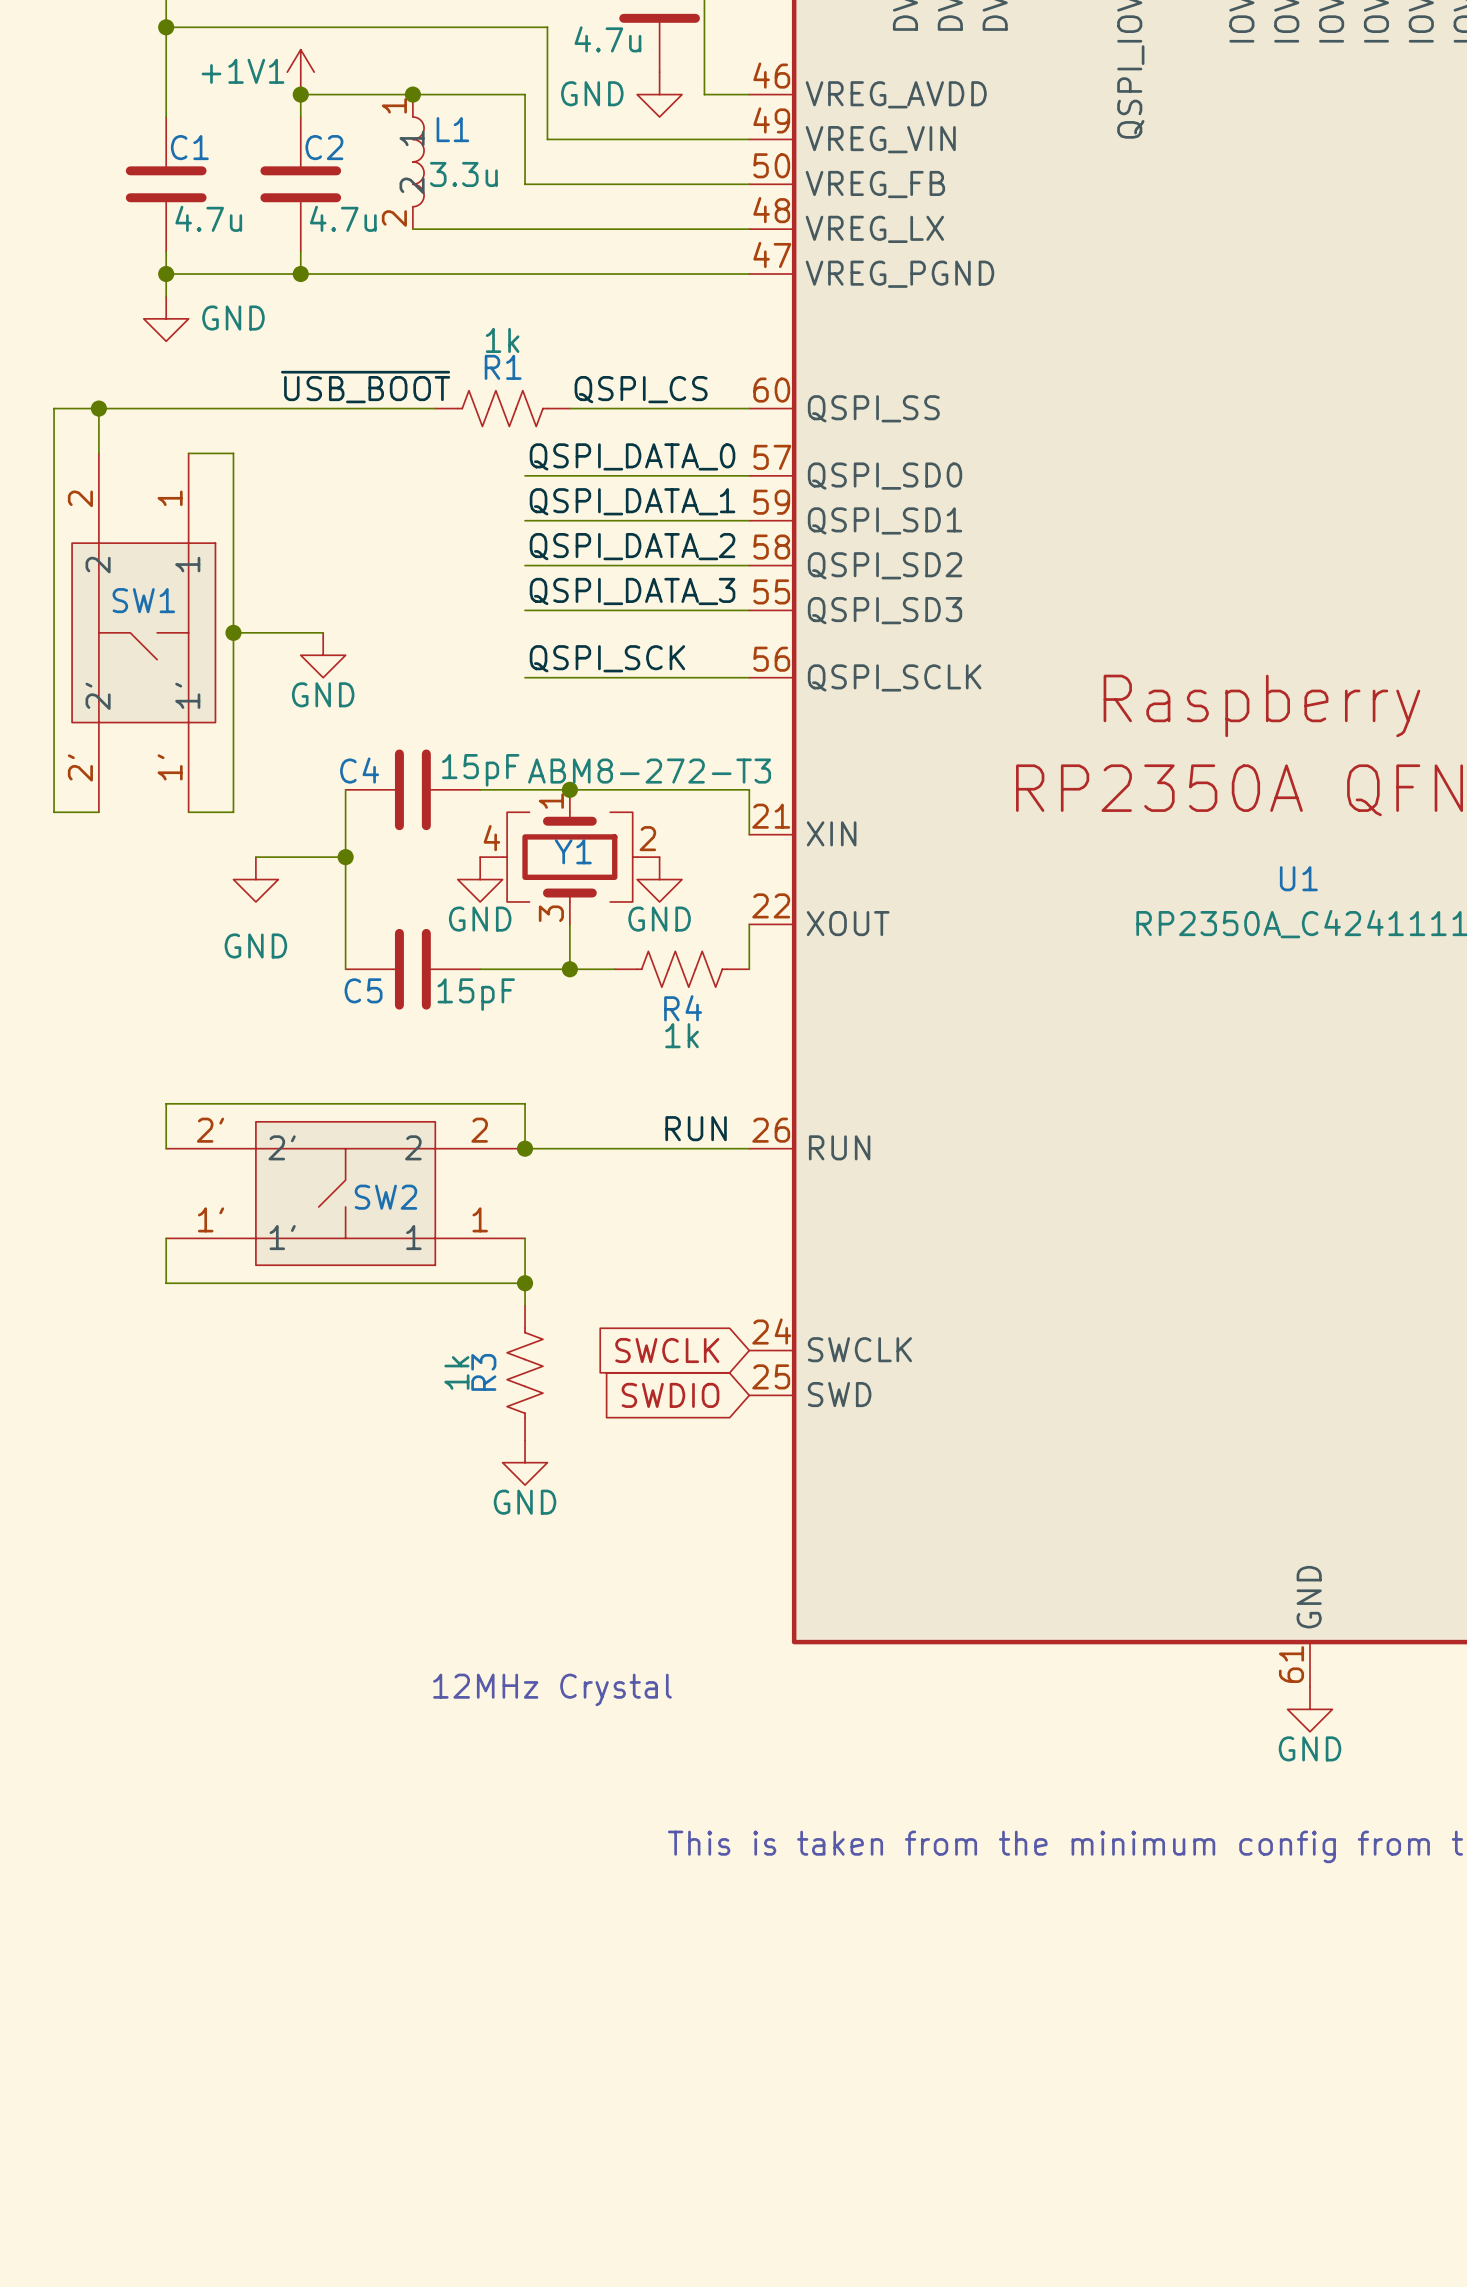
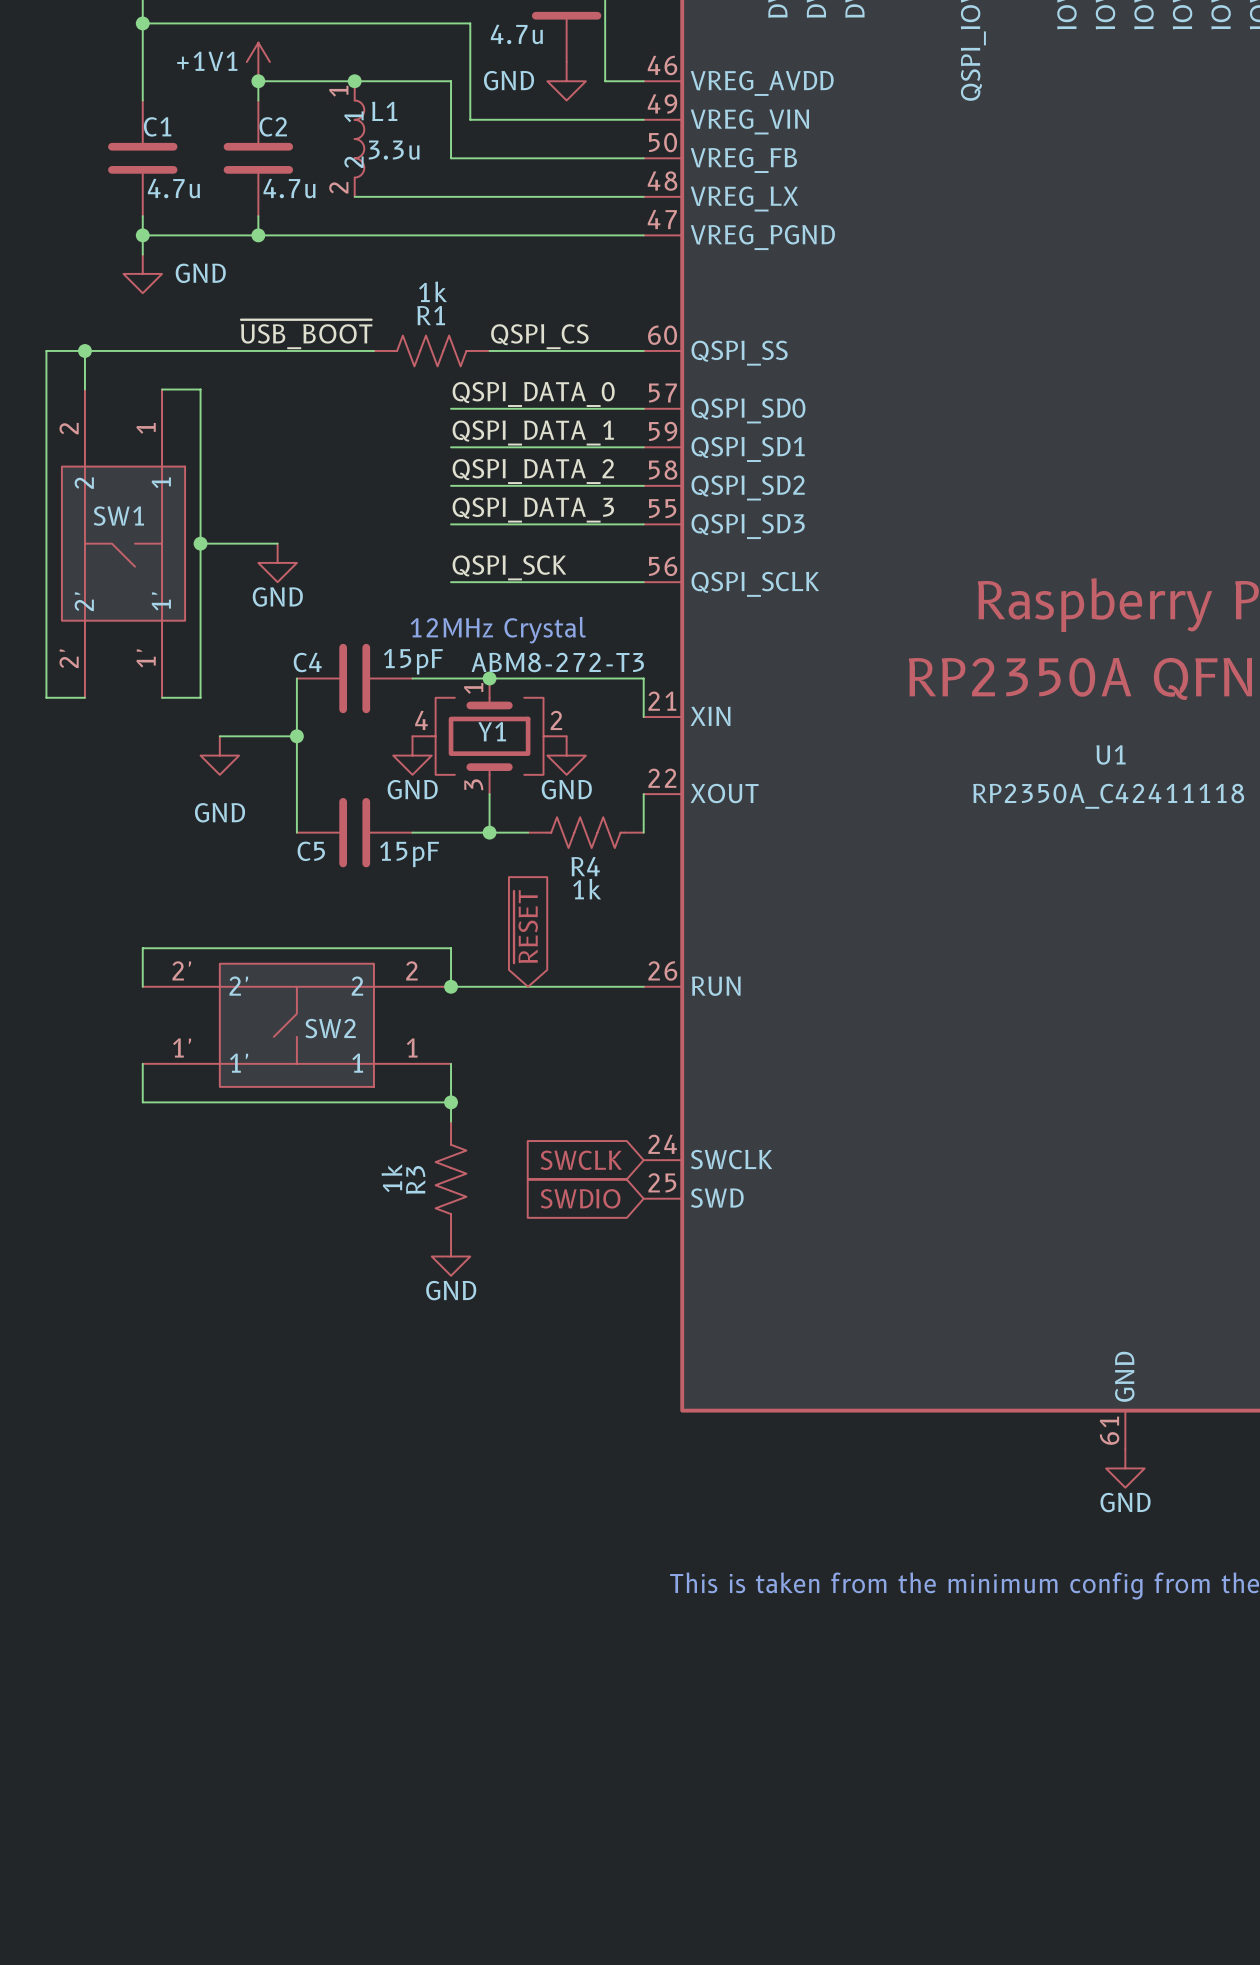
text: none -> 12MHz Crystal (498, 630)
global label: none -> ~{RESET} (525, 926)
label: RUN (696, 1128) -> none
text: 12MHz Crystal (552, 1689) -> none

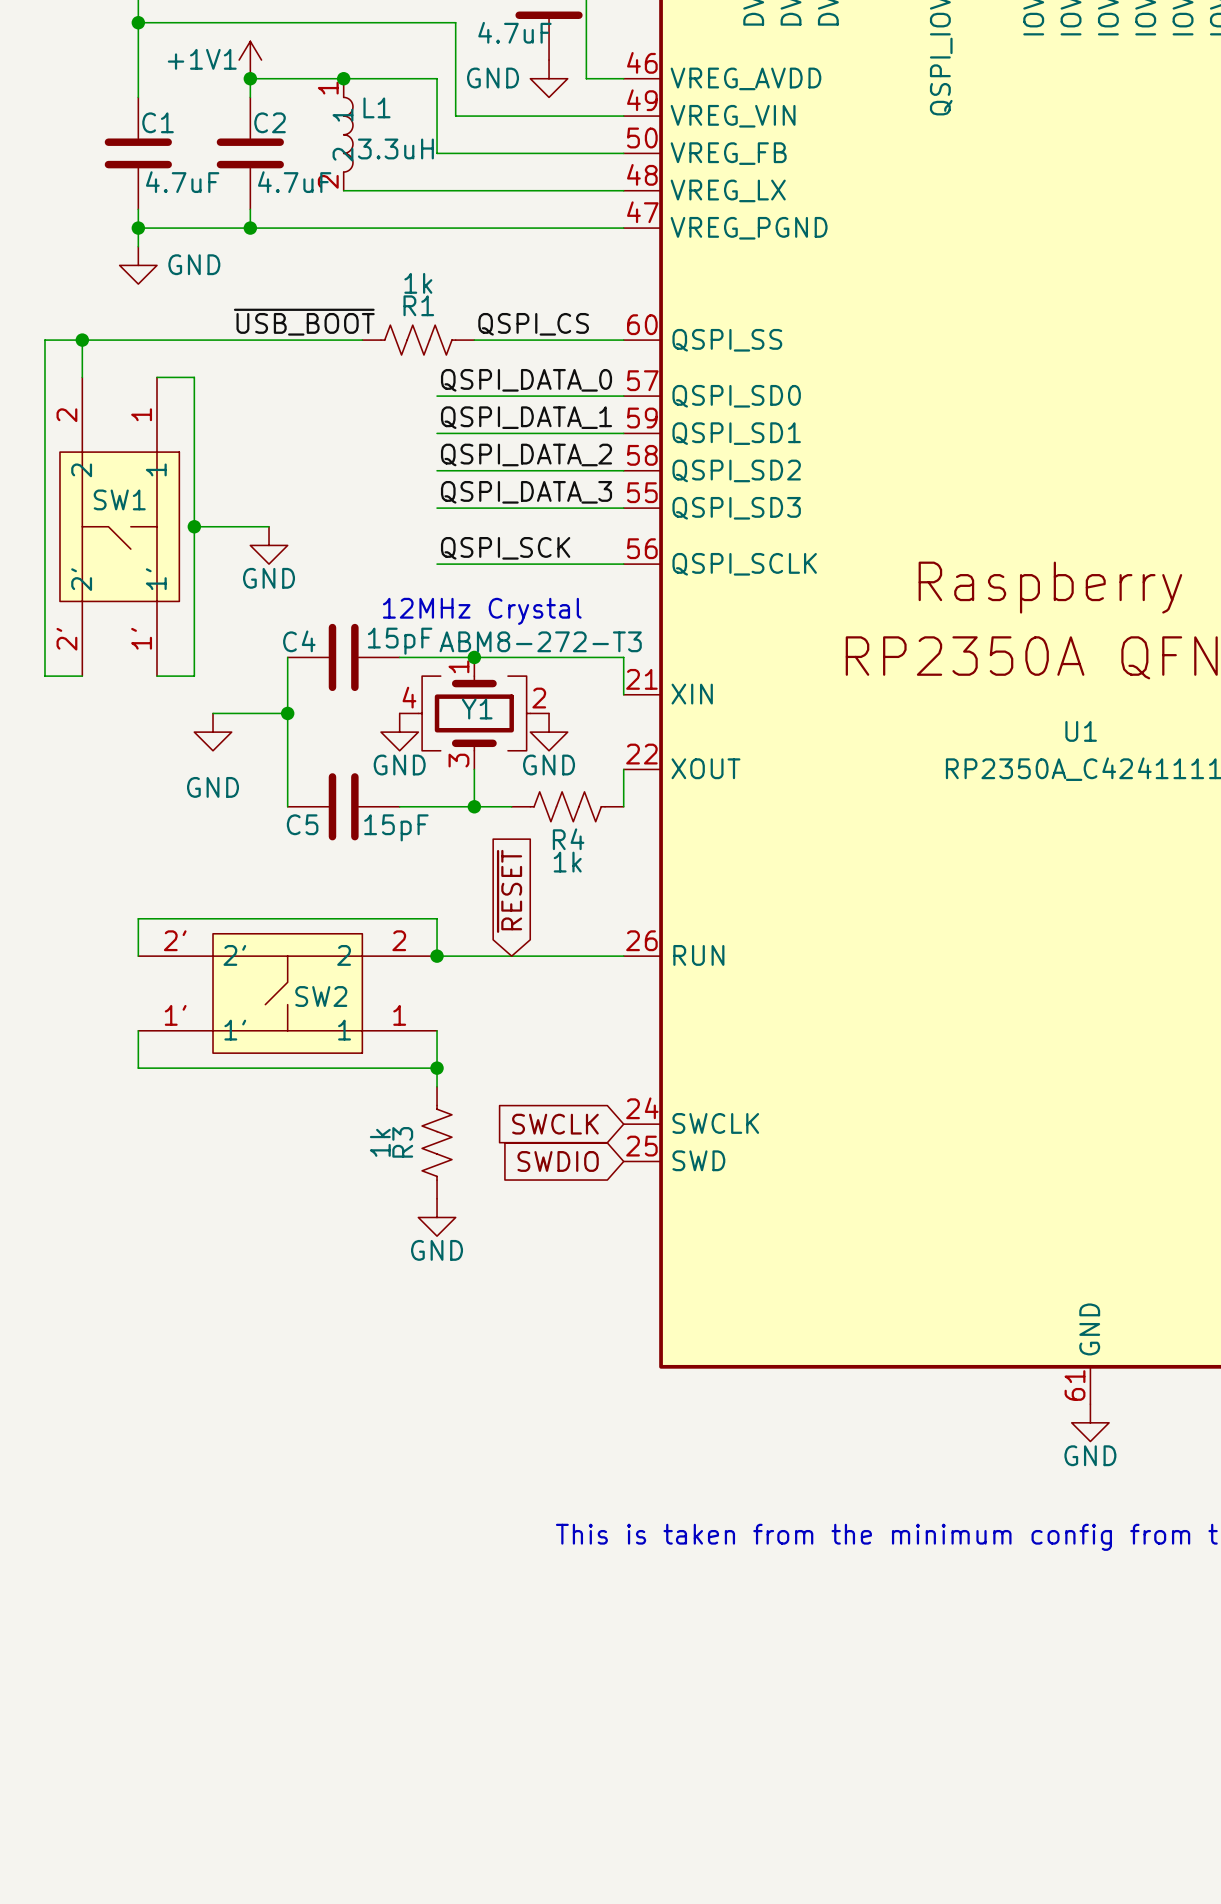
part value: 4.7u (516, 34) -> 4.7uF (514, 32)
L1 value: 3.3u (394, 150) -> 3.3uH (395, 148)
C1 value: 4.7u (173, 188) -> 4.7uF (182, 182)
C2 value: 4.7u (289, 188) -> 4.7uF (294, 182)

